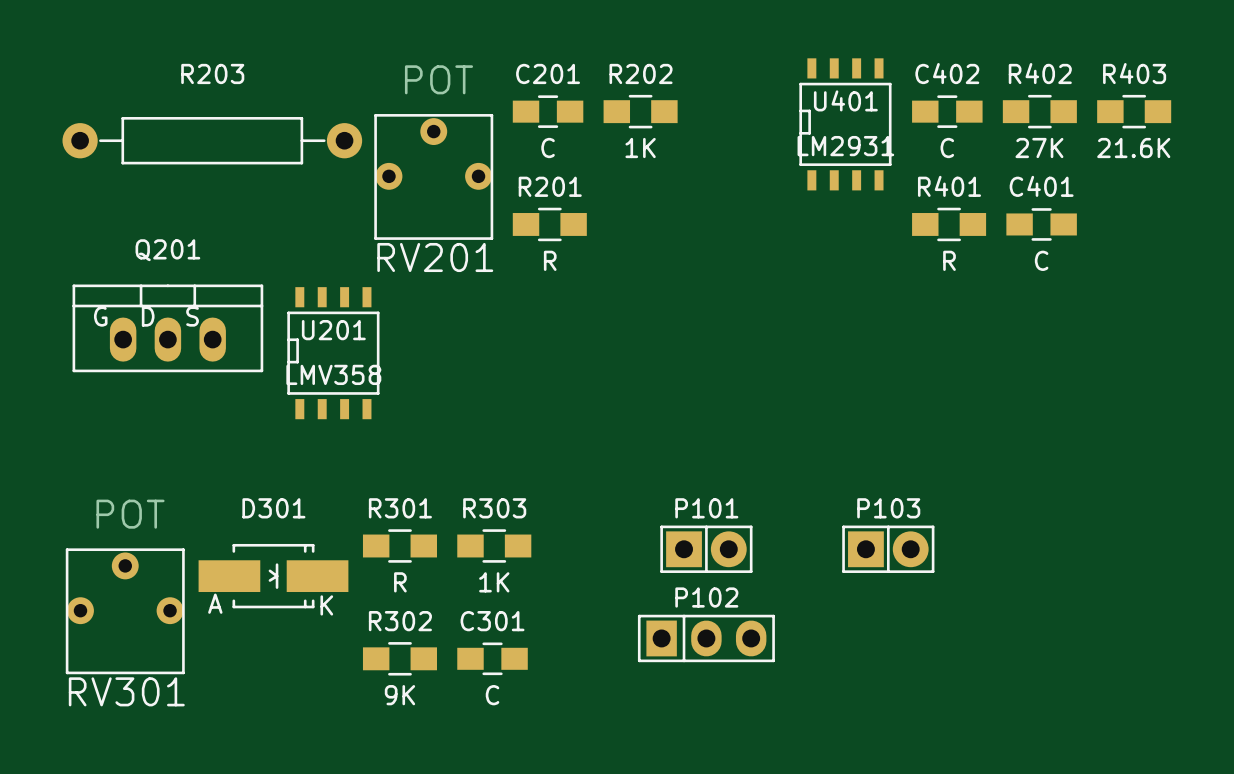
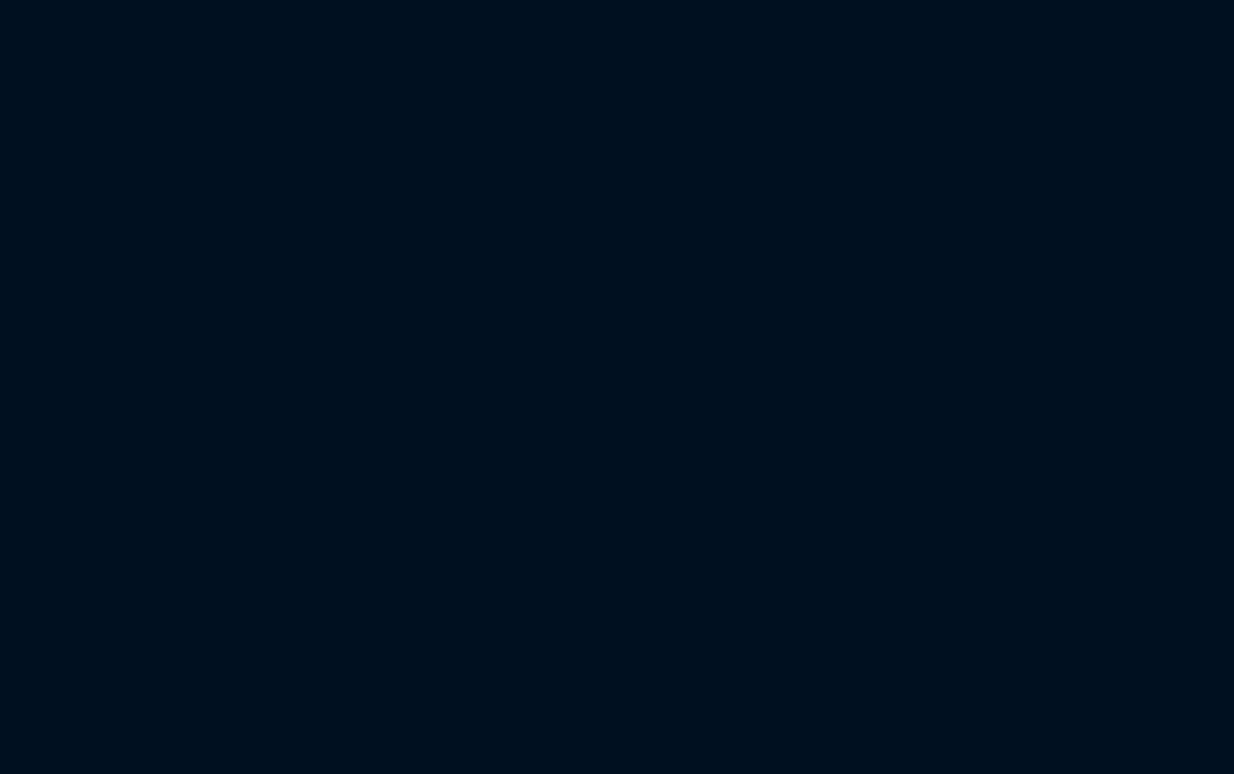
C201: C (548, 111) -> none
R202: 1K (640, 111) -> none
C402: C (947, 111) -> none
R402: 27K (1039, 111) -> none
R403: 21.6K (1134, 111) -> none
U401: LM2931 (845, 124) -> none
R203: (212, 140) -> none
RV201: POT (433, 176) -> none
R201: R (549, 224) -> none
R401: R (949, 224) -> none
C401: C (1041, 224) -> none
Q201: (167, 328) -> none
U201: LMV358 (333, 353) -> none
R301: R (399, 545) -> none
R303: 1K (494, 545) -> none
P101: (706, 549) -> none
P103: (888, 549) -> none
D301: (273, 576) -> none
RV301: POT (125, 611) -> none
P102: (706, 638) -> none
R302: 9K (399, 658) -> none
C301: C (492, 658) -> none

